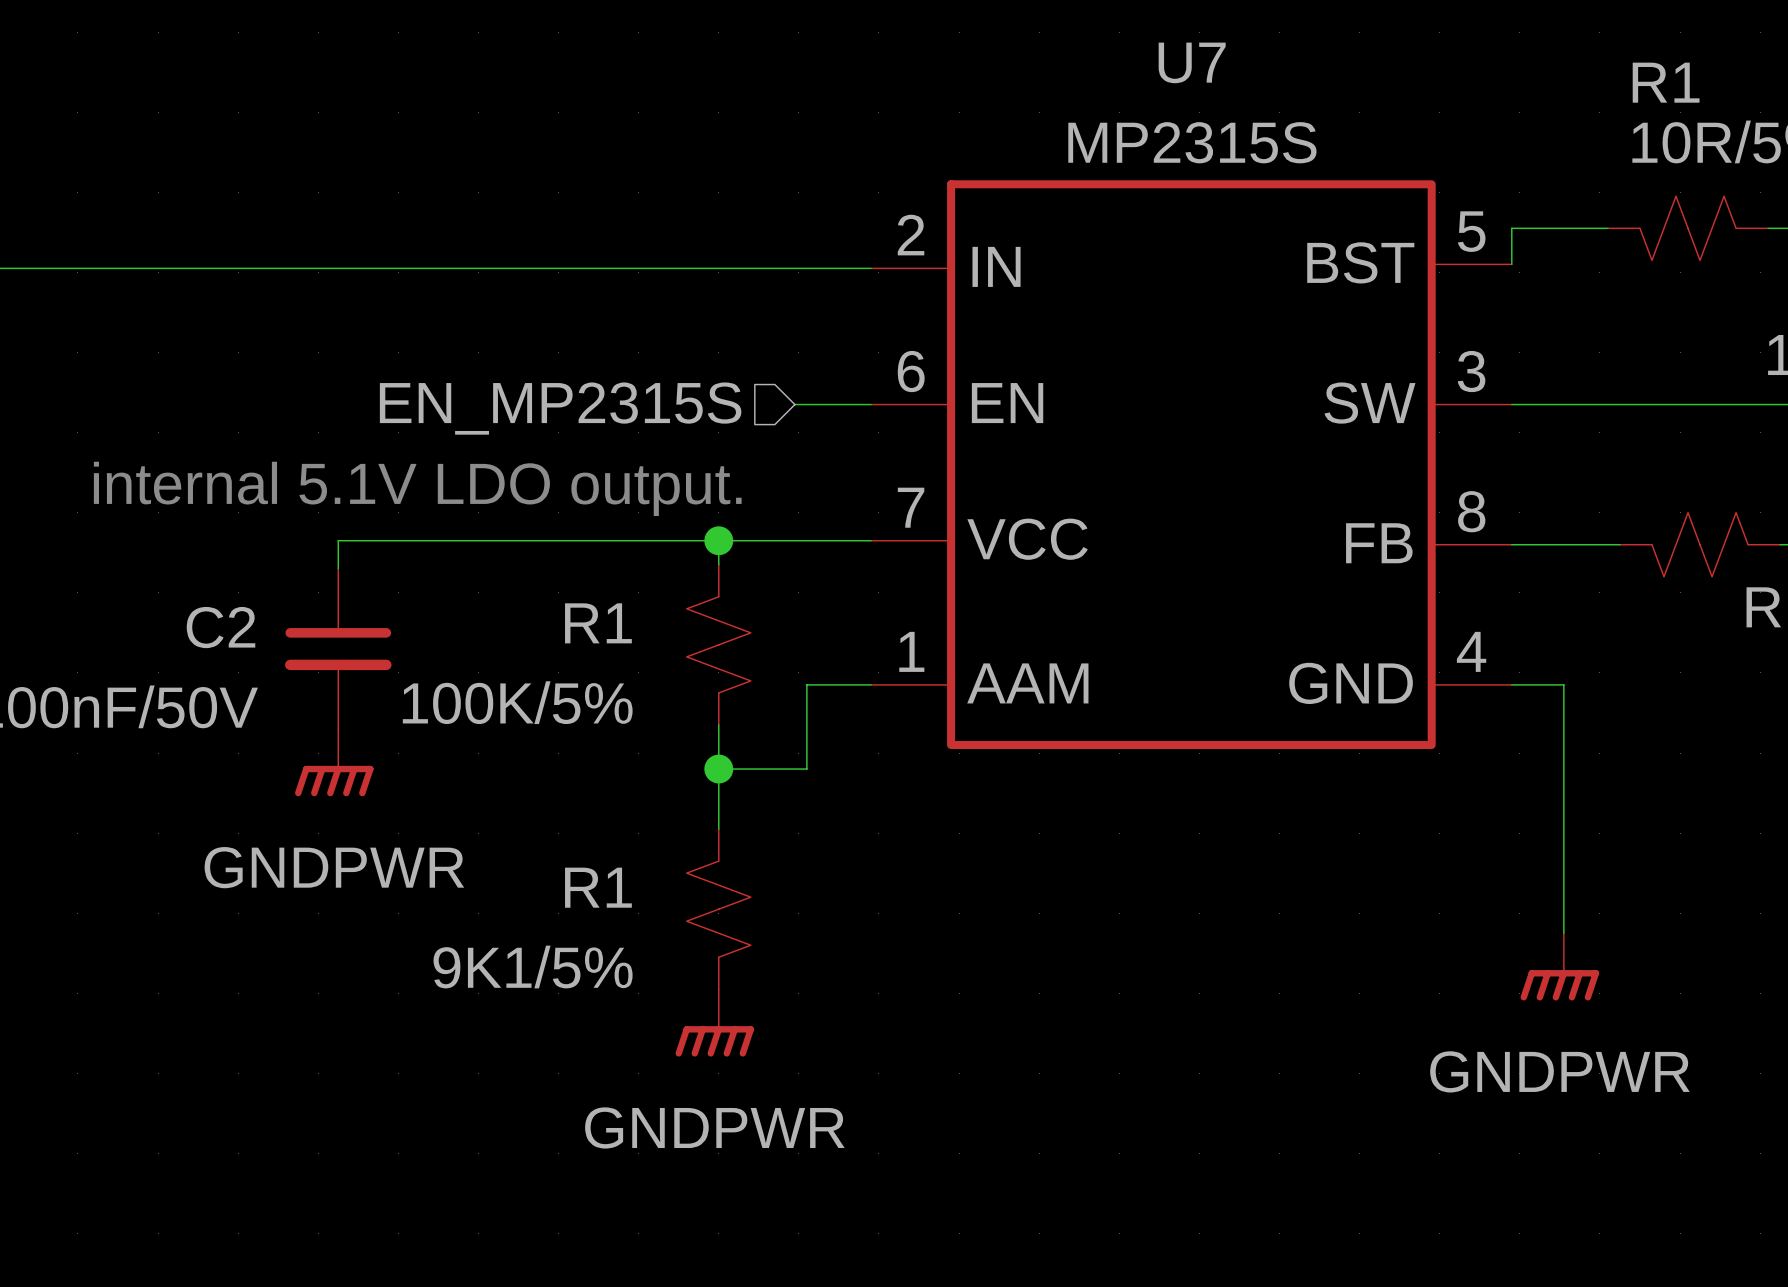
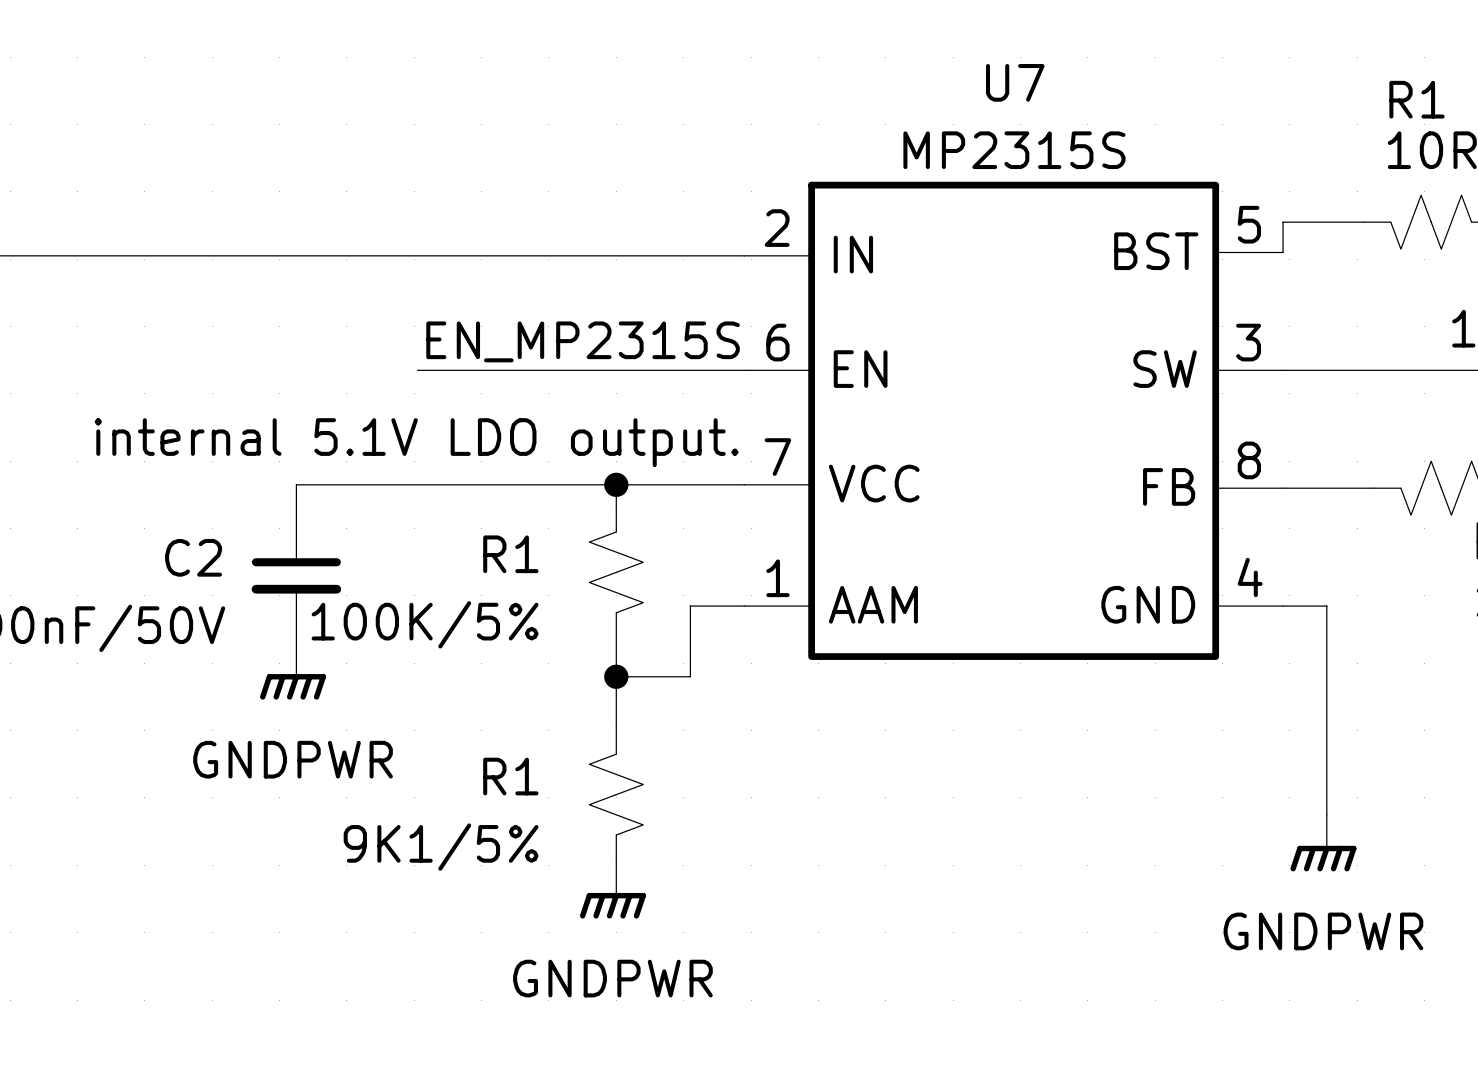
label: none -> EN_MP2315S (583, 341)
wire: none -> (417, 370) (680, 370)
hierarchical label: EN_MP2315S (560, 408) -> none

